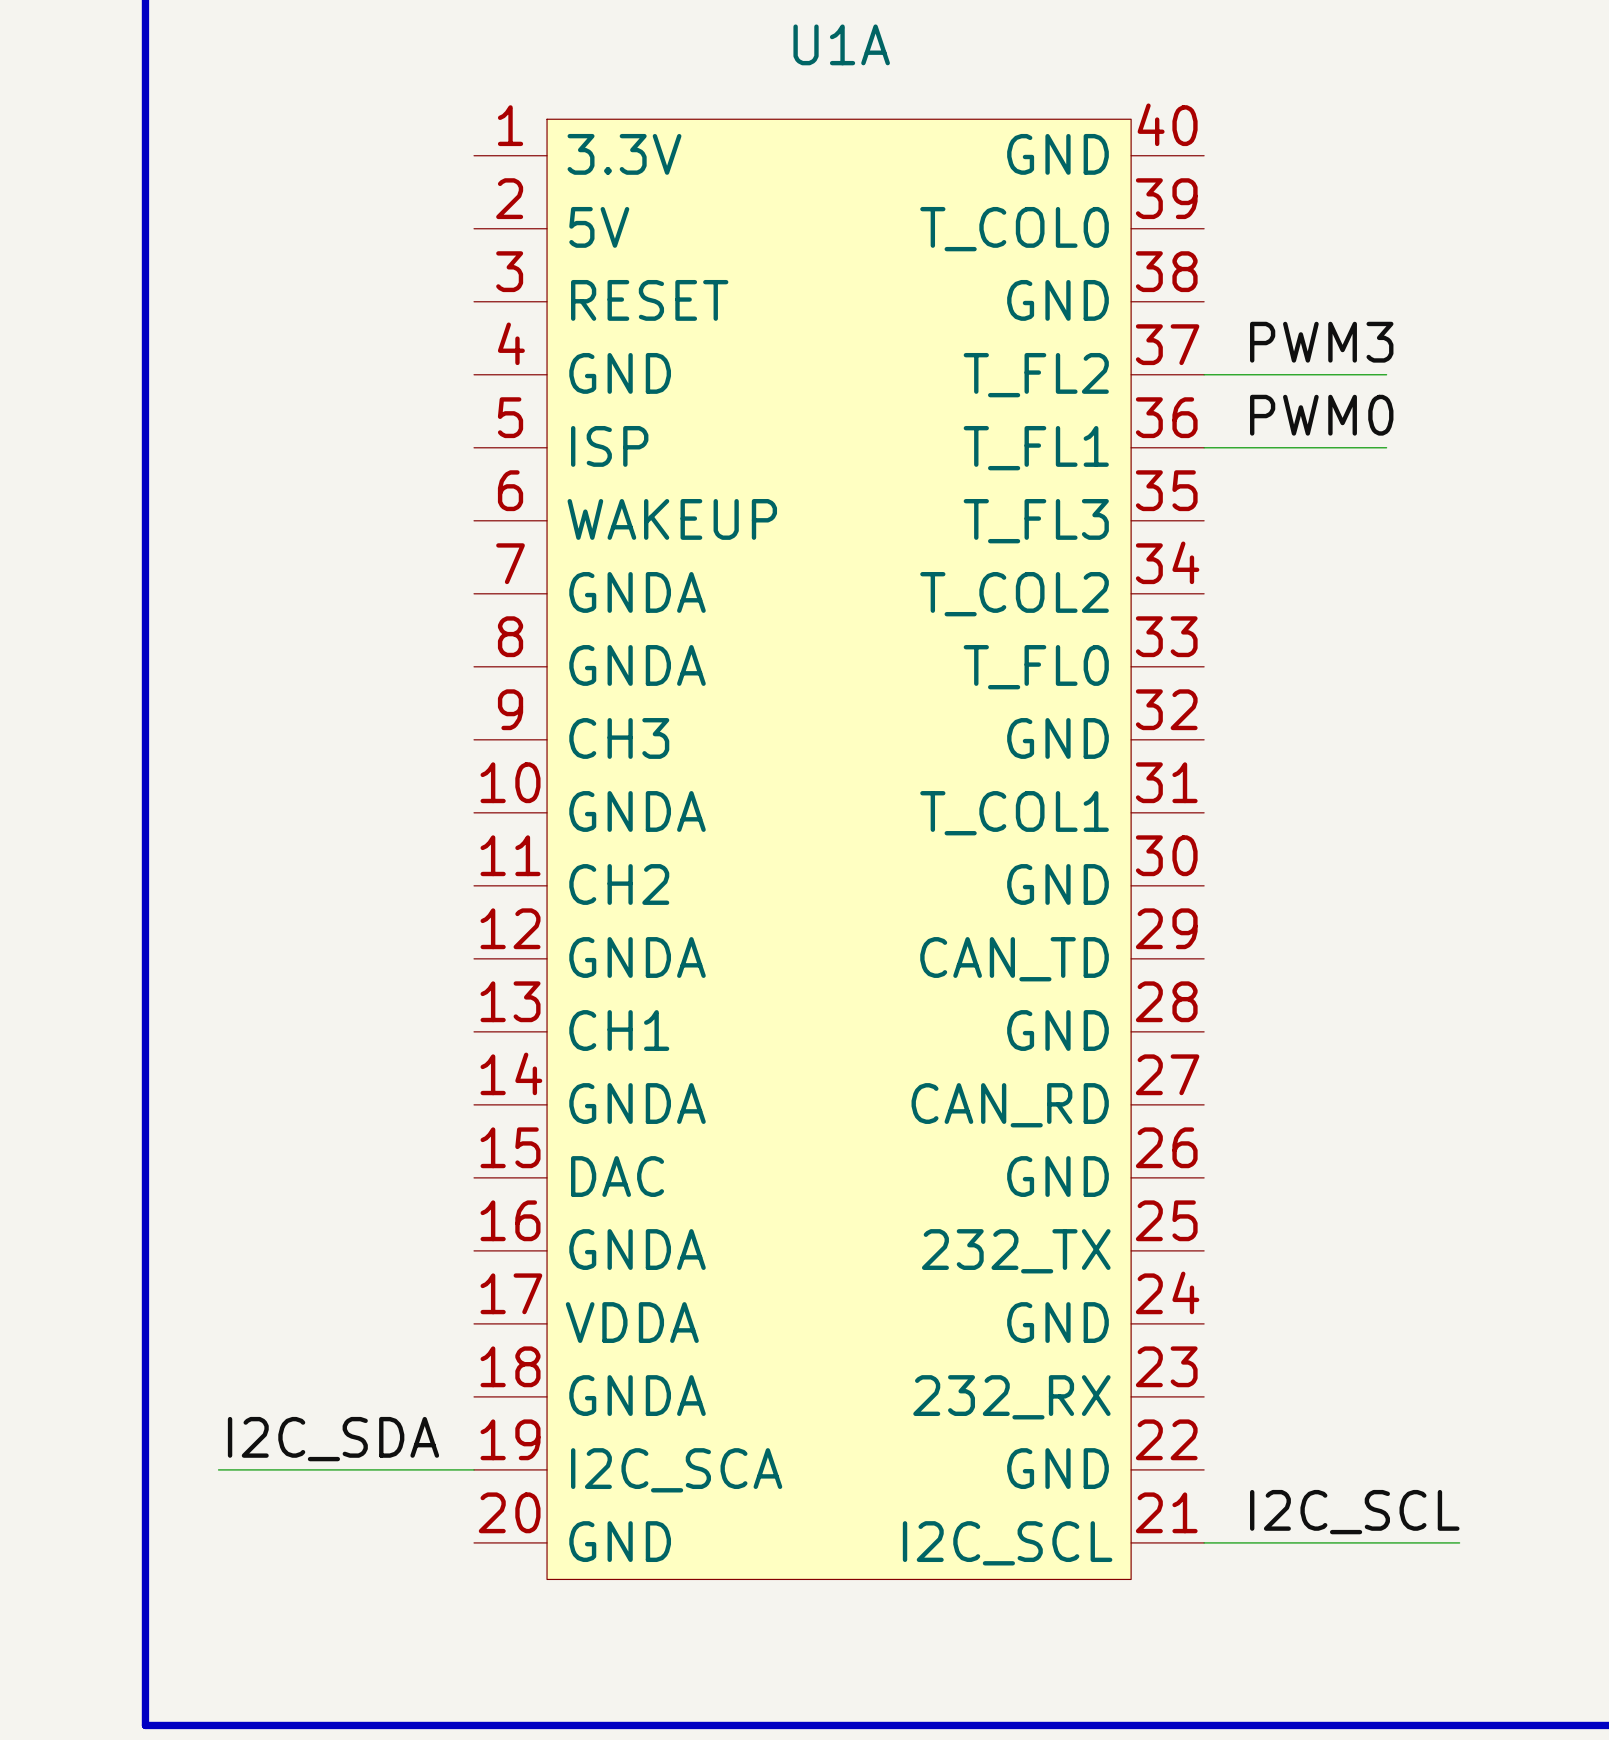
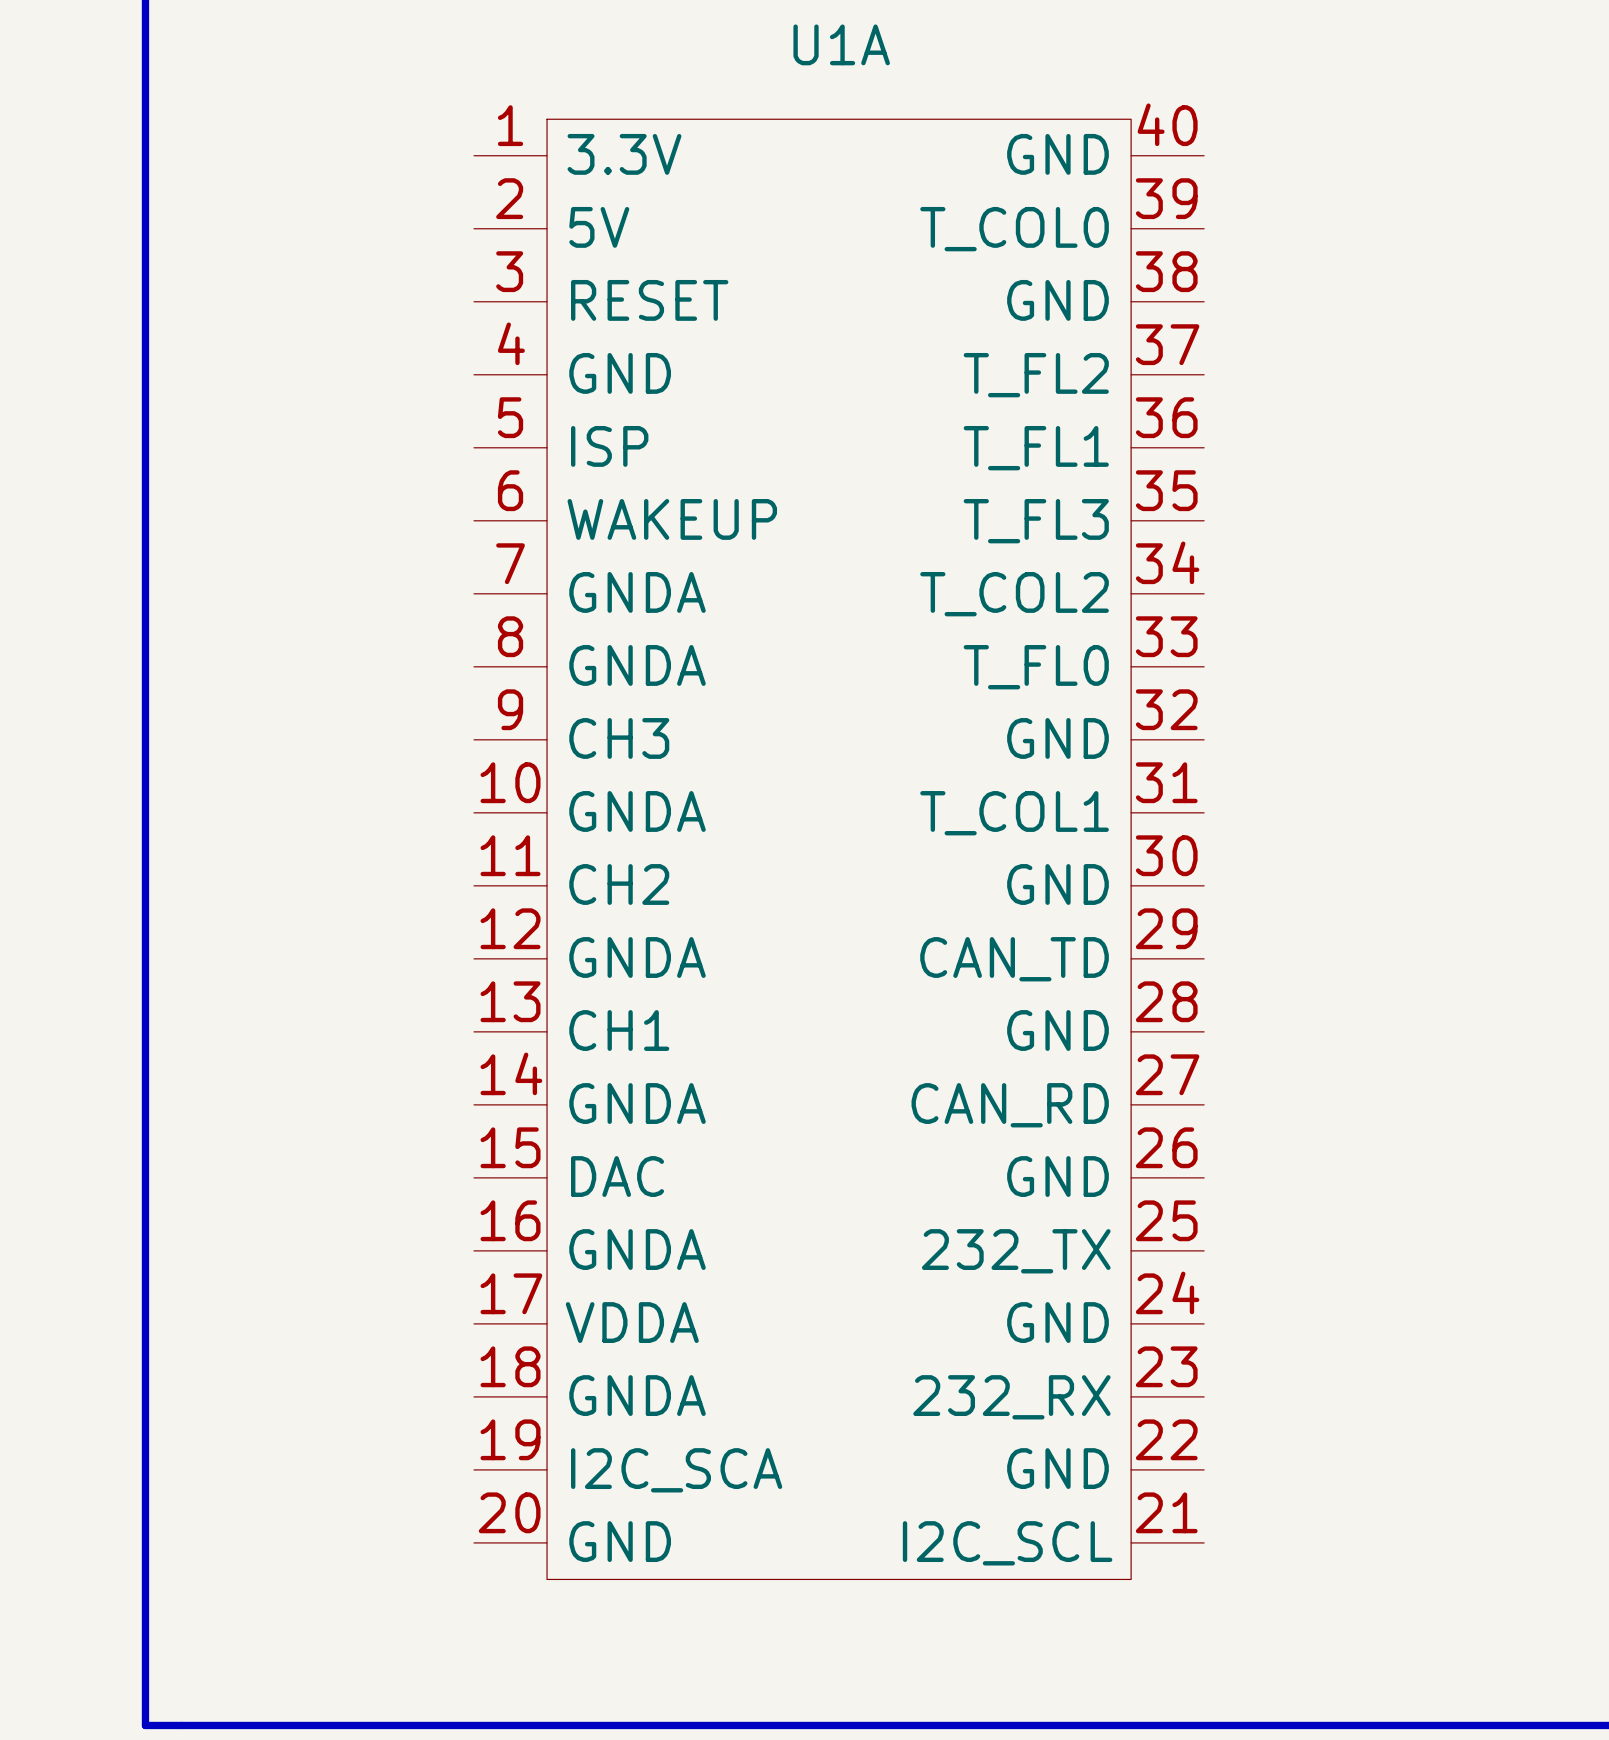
U1A symbol: [474, 119, 1205, 1580] -> [474, 119, 1205, 1580]
label: PWM3 (1321, 342) -> none
wire: (1204, 374) (1386, 374) -> none
label: PWM0 (1321, 415) -> none
wire: (1204, 447) (1386, 447) -> none
label: I2C_SDA (333, 1439) -> none
wire: (218, 1469) (474, 1469) -> none
label: I2C_SCL (1354, 1512) -> none
wire: (1204, 1542) (1459, 1542) -> none

